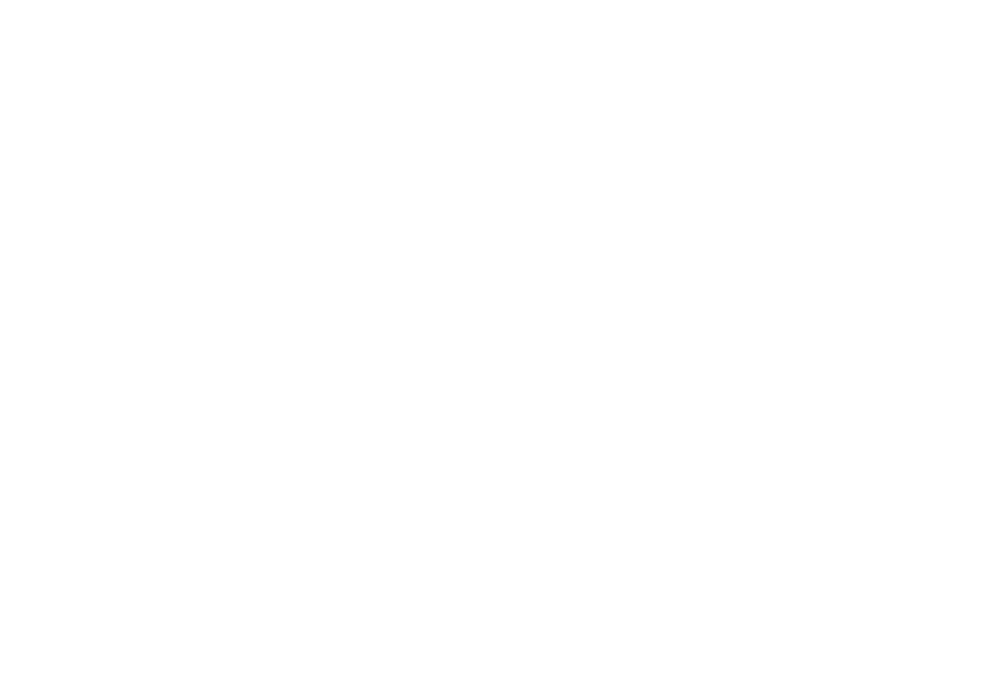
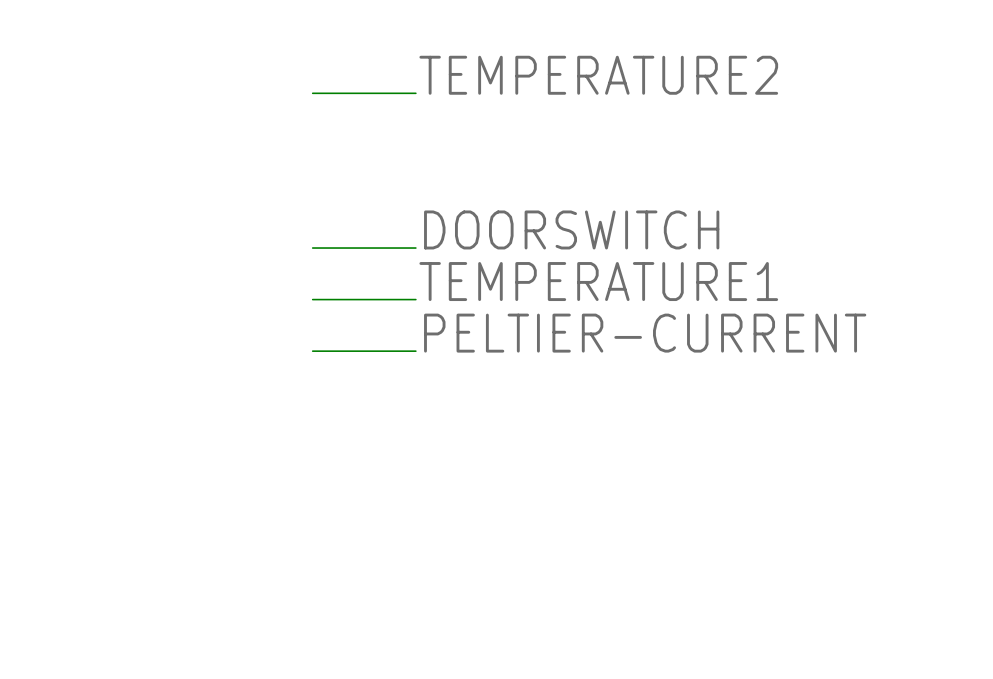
label: none -> TEMPERATURE2 (598, 75)
wire: none -> (312, 93) (415, 93)
label: none -> DOORSWITCH (571, 229)
wire: none -> (312, 248) (415, 248)
label: none -> TEMPERATURE1 (598, 281)
wire: none -> (312, 299) (415, 299)
label: none -> PELTIER-CURRENT (645, 333)
wire: none -> (312, 351) (415, 351)

